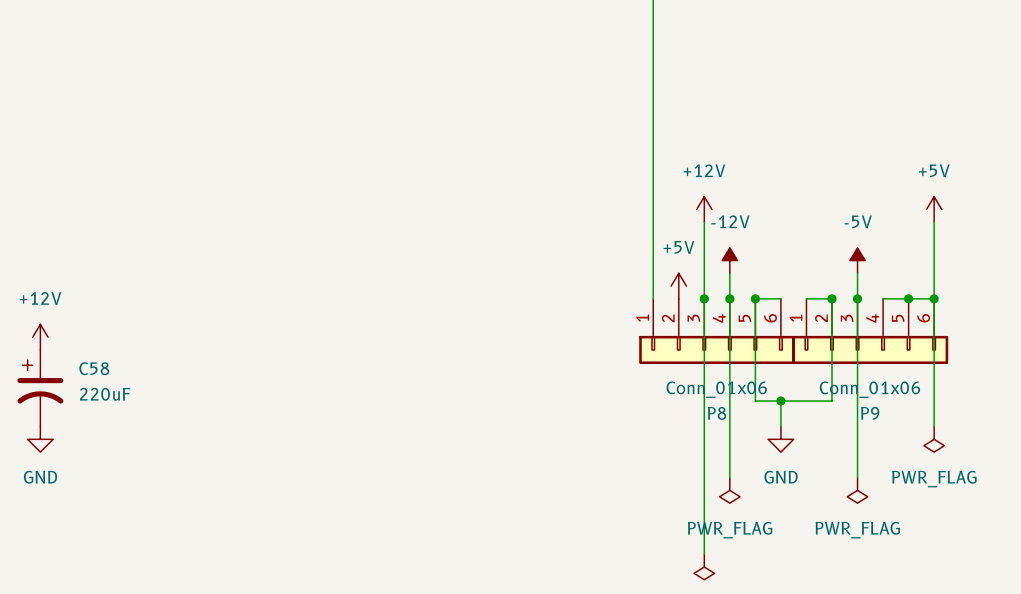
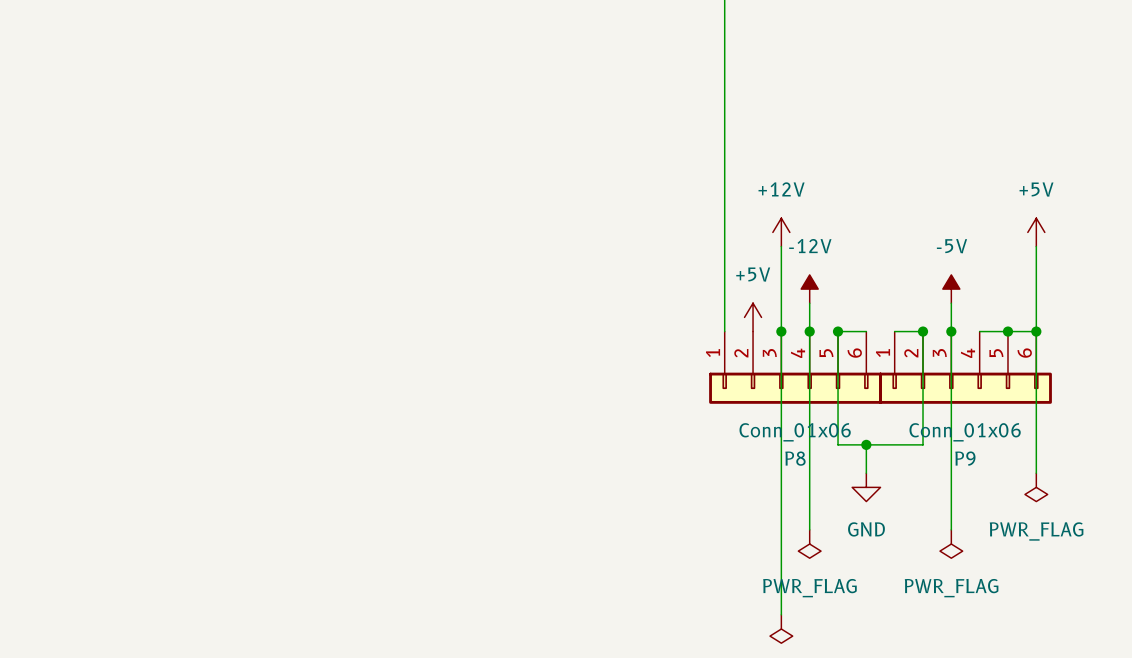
power symbol: +12V (40, 337) -> none
C58: 220uF (40, 388) -> none
power symbol: GND (40, 439) -> none

